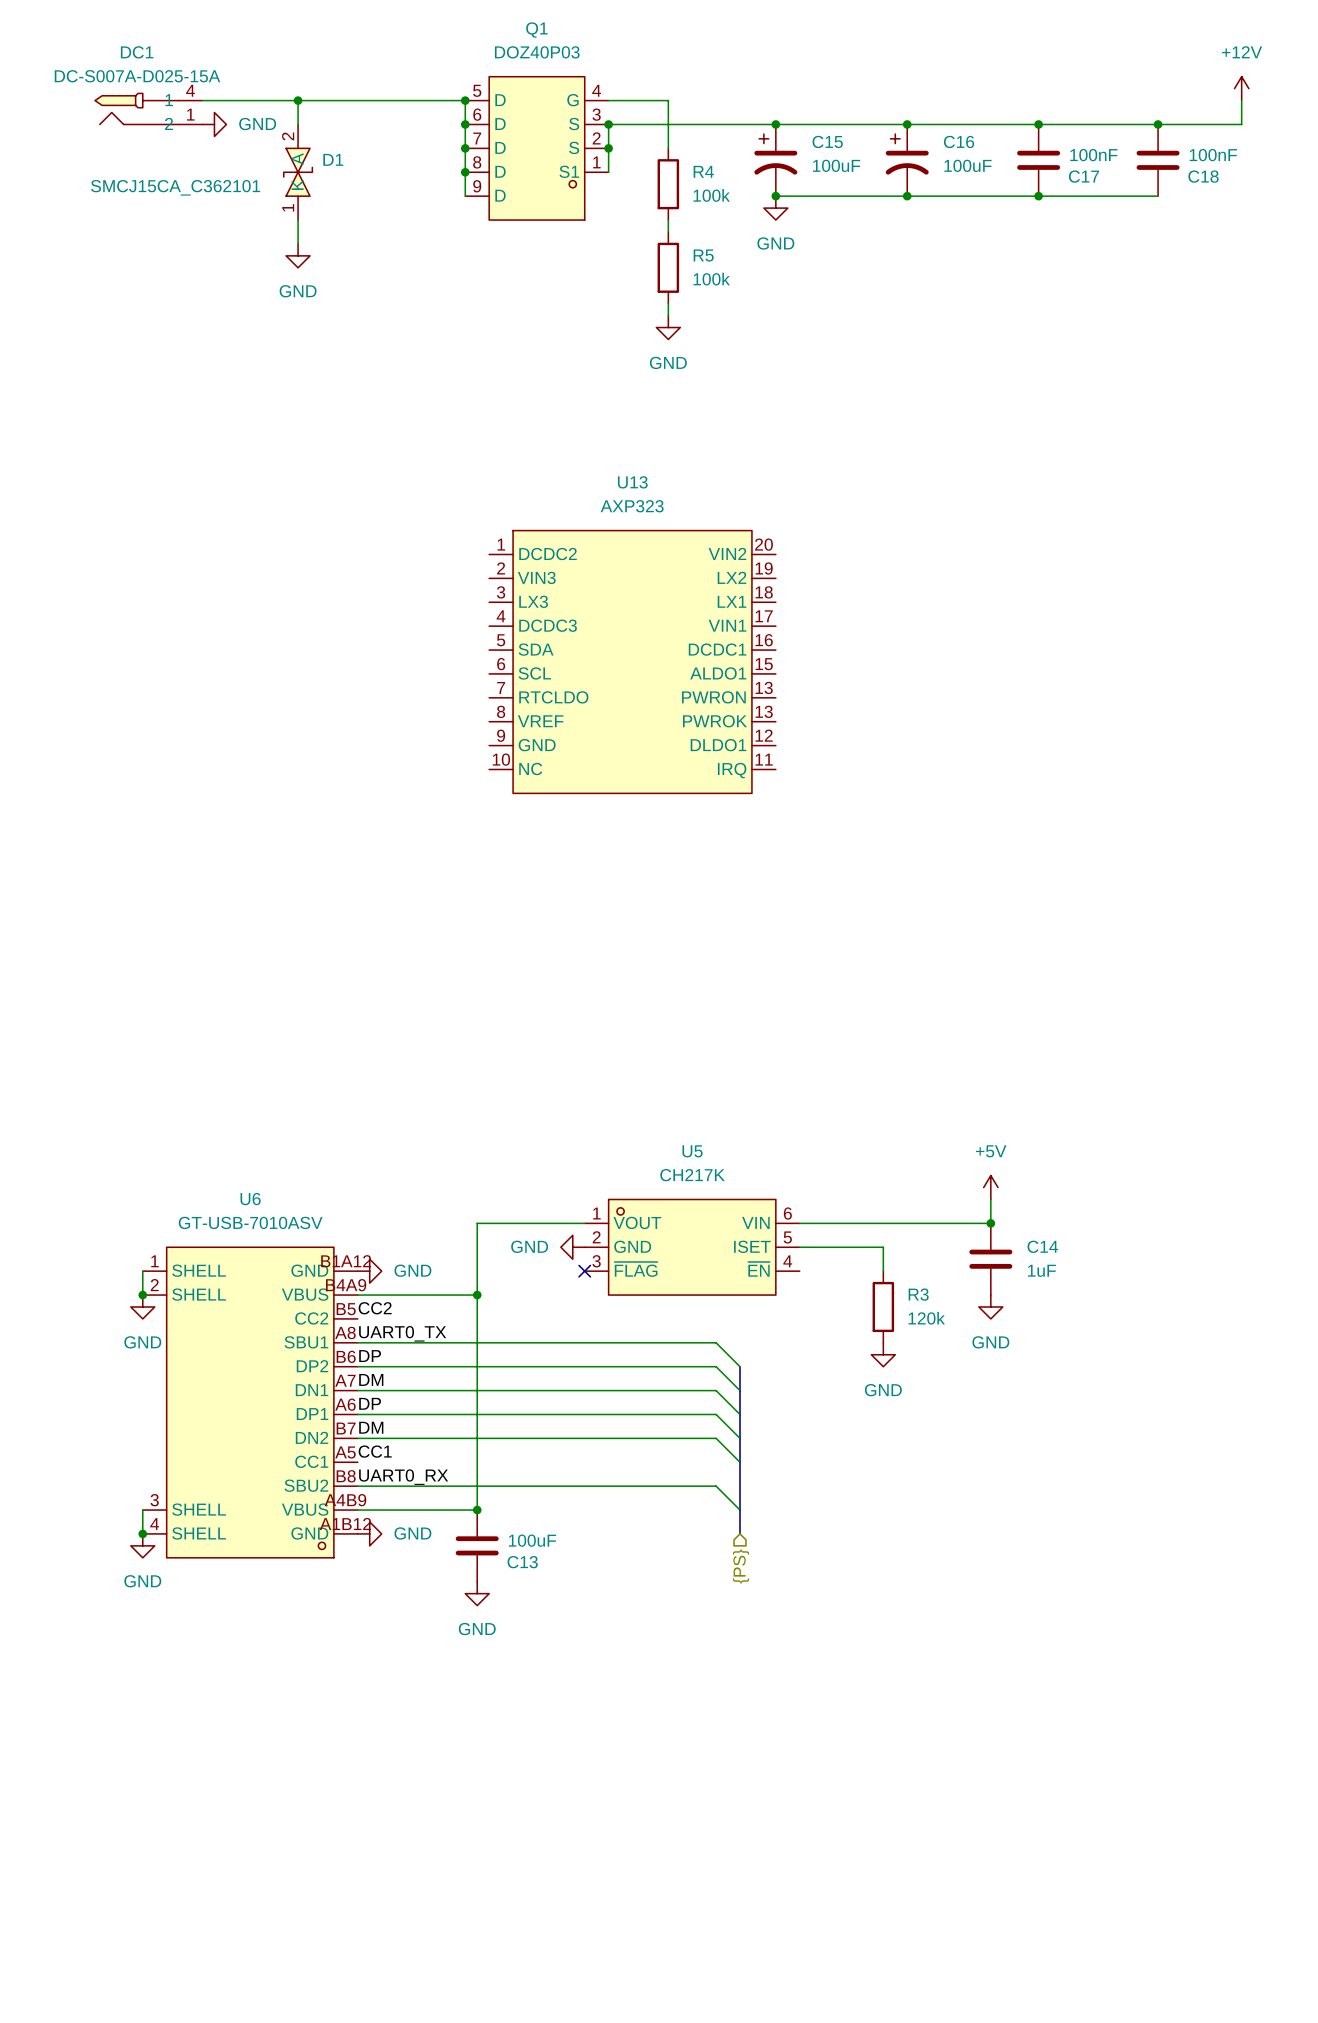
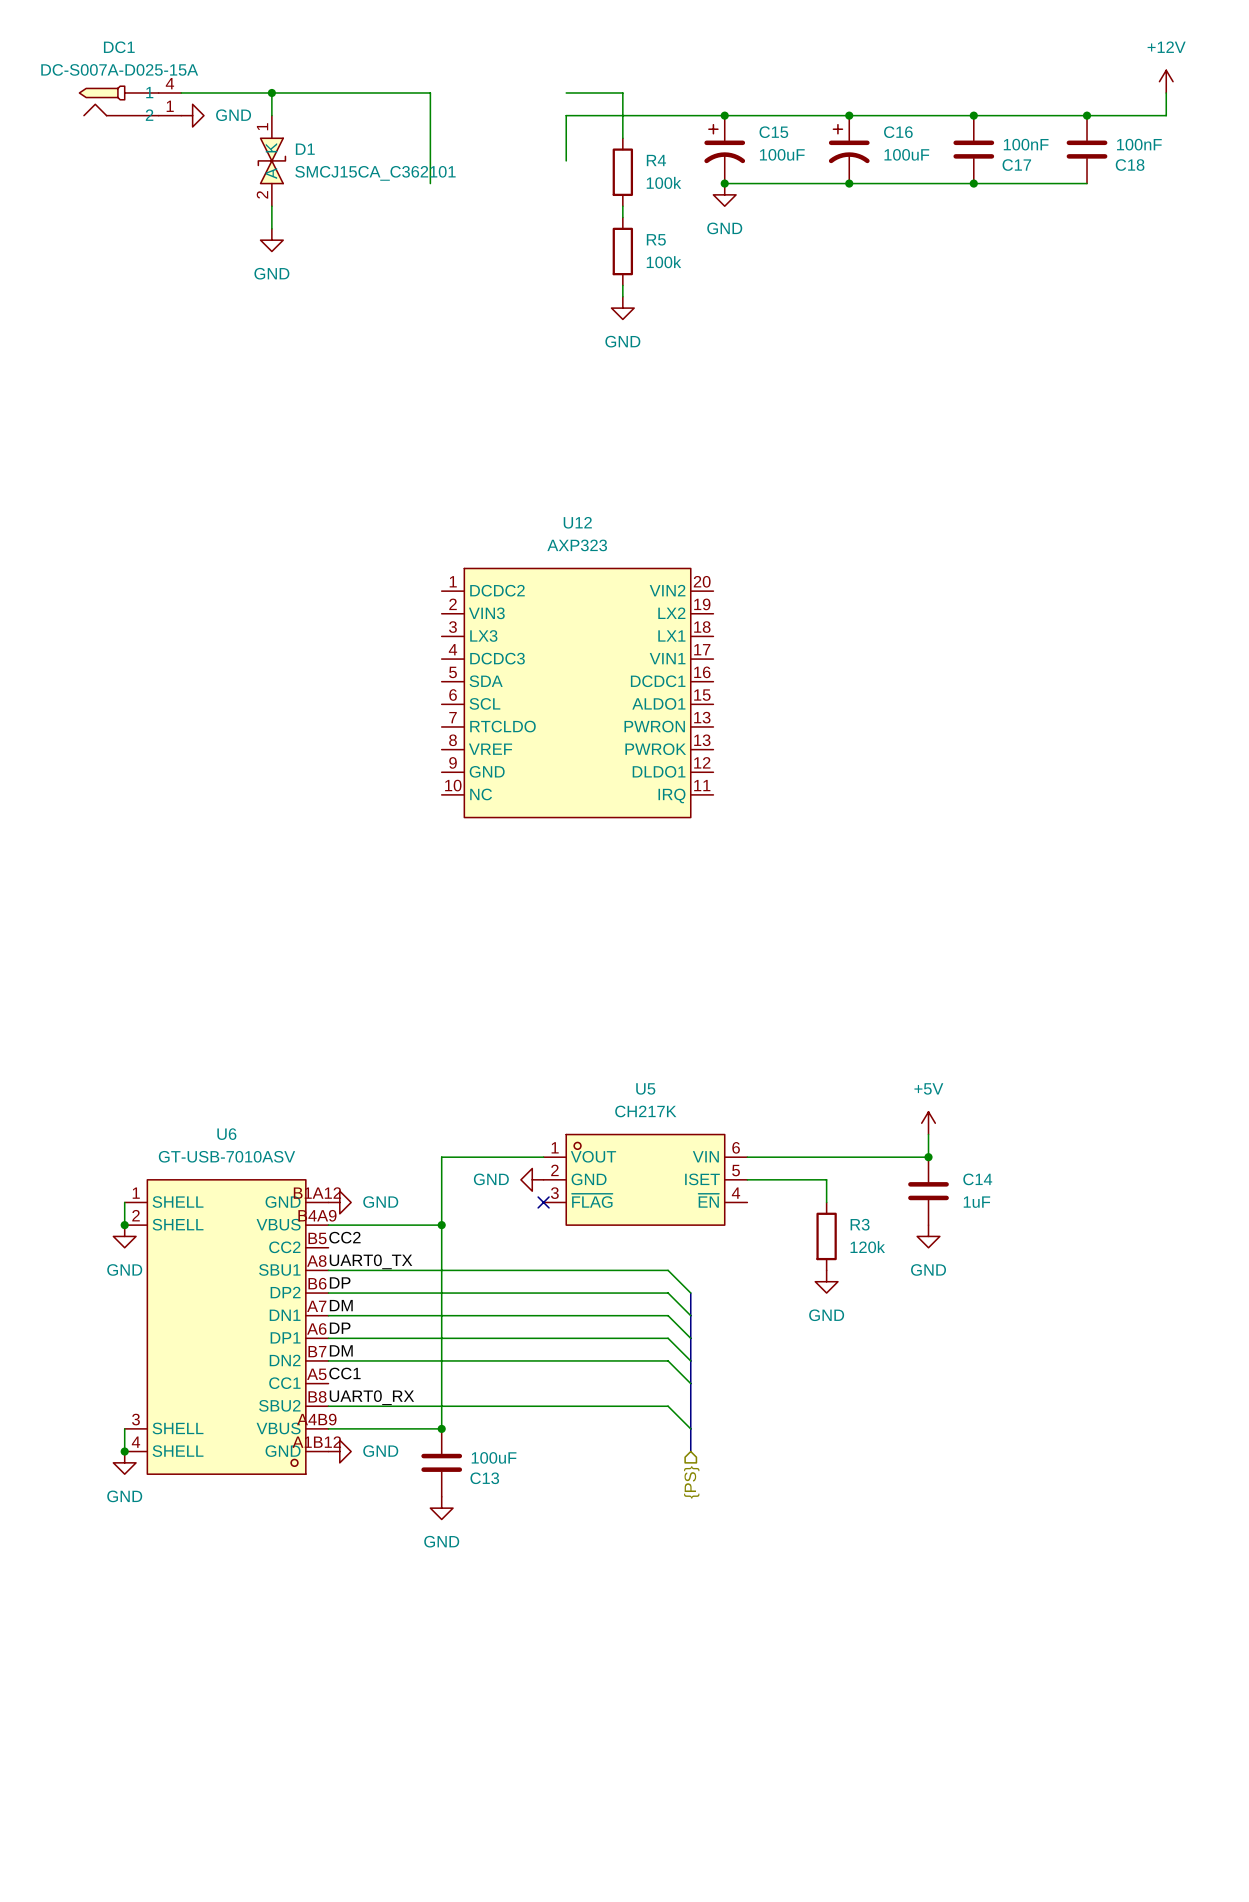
junction: (465, 100) -> none
junction: (465, 124) -> none
junction: (608, 124) -> none
junction: (465, 148) -> none
Q1: DOZ40P03 (536, 148) -> none
junction: (608, 148) -> none
D1 rotation: 0° (298, 172) -> 180° (271, 160)
junction: (465, 172) -> none
D1 value position: SMCJ15CA_C362101 (175, 187) -> SMCJ15CA_C362101 (375, 173)
U13: AXP323 (632, 661) -> none
U12: none -> AXP323 (577, 693)

